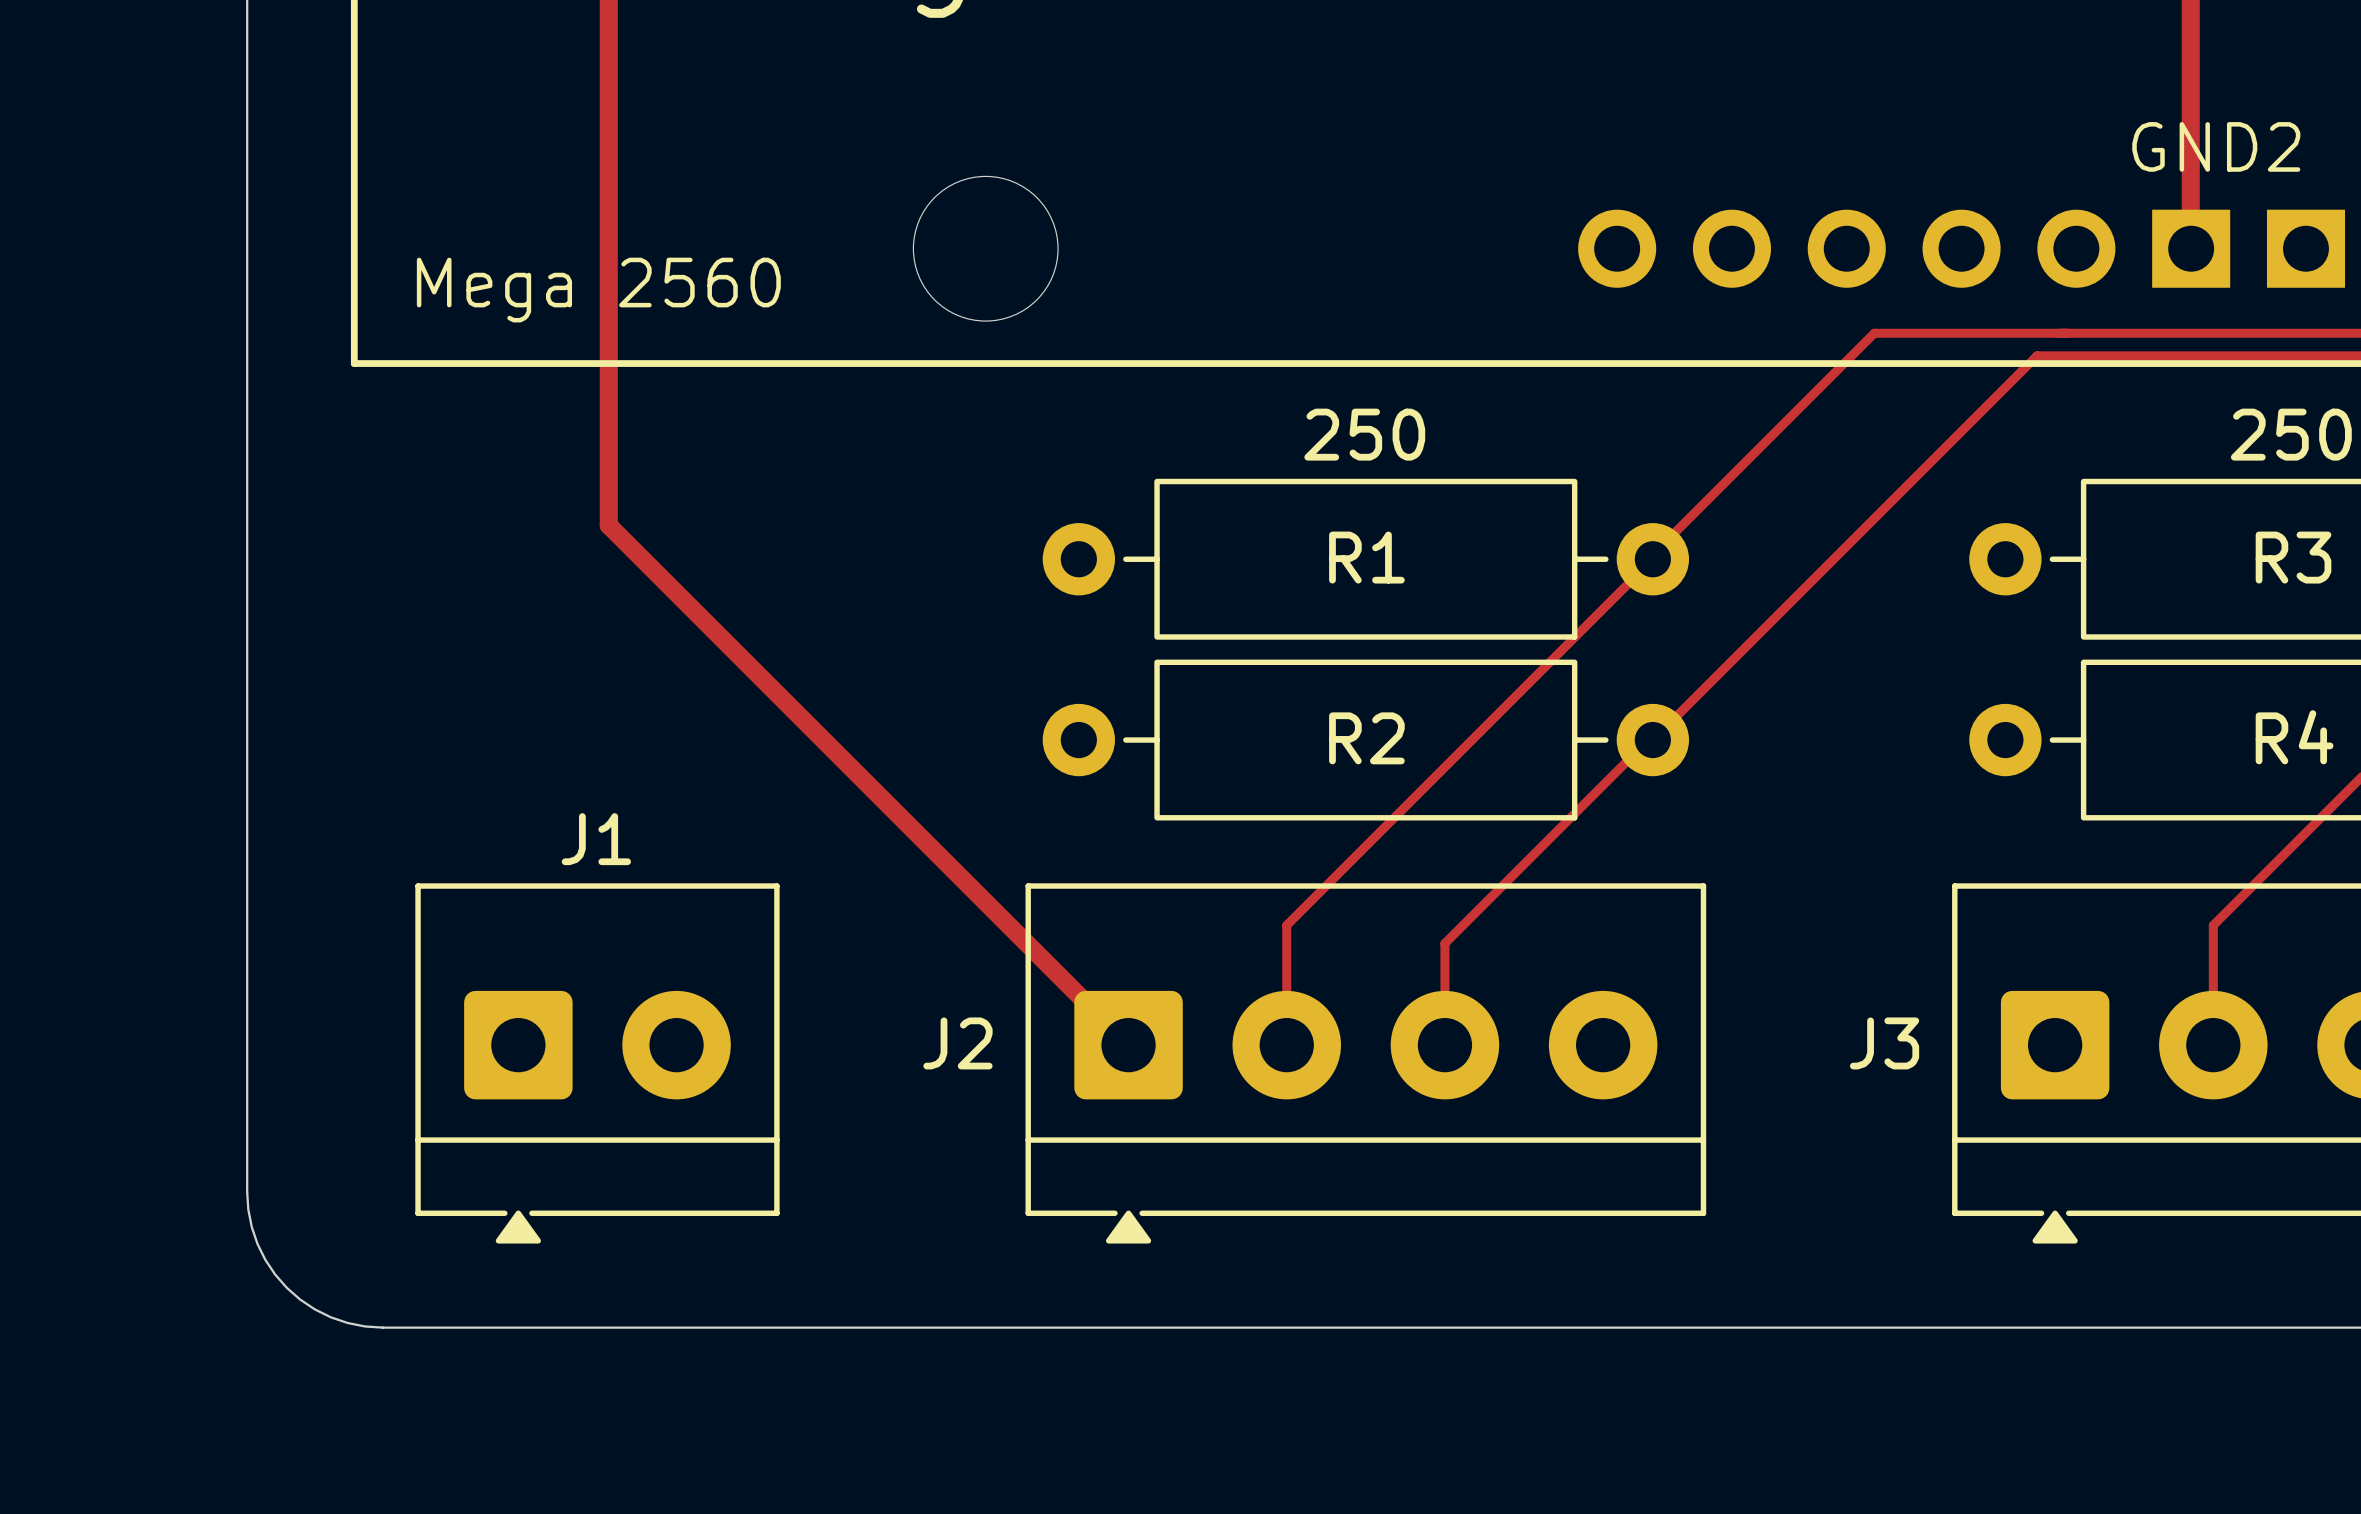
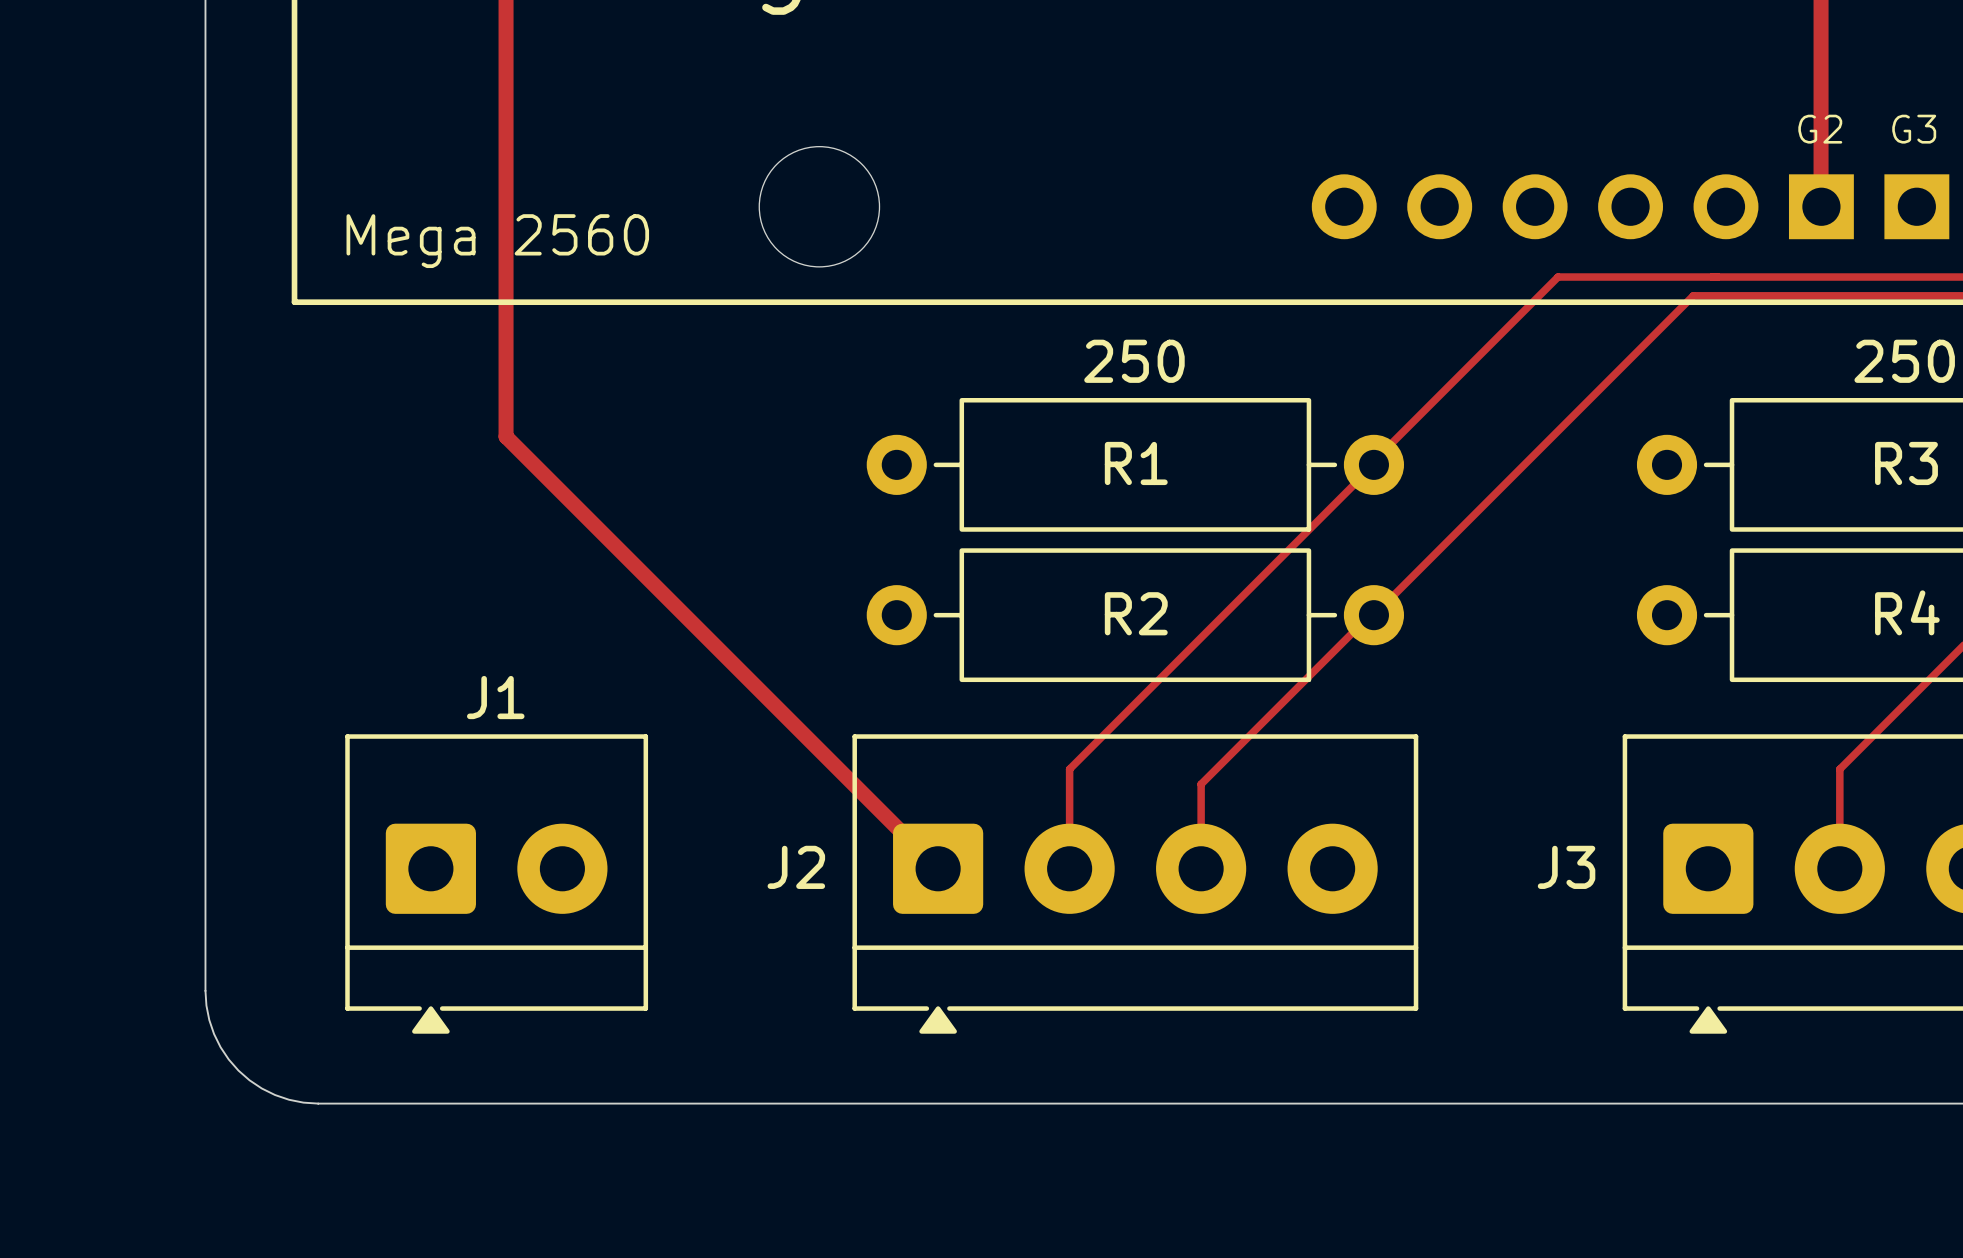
text: GND2 (2216, 146) -> G2 (1820, 129)
text: none -> G3 (1914, 129)

